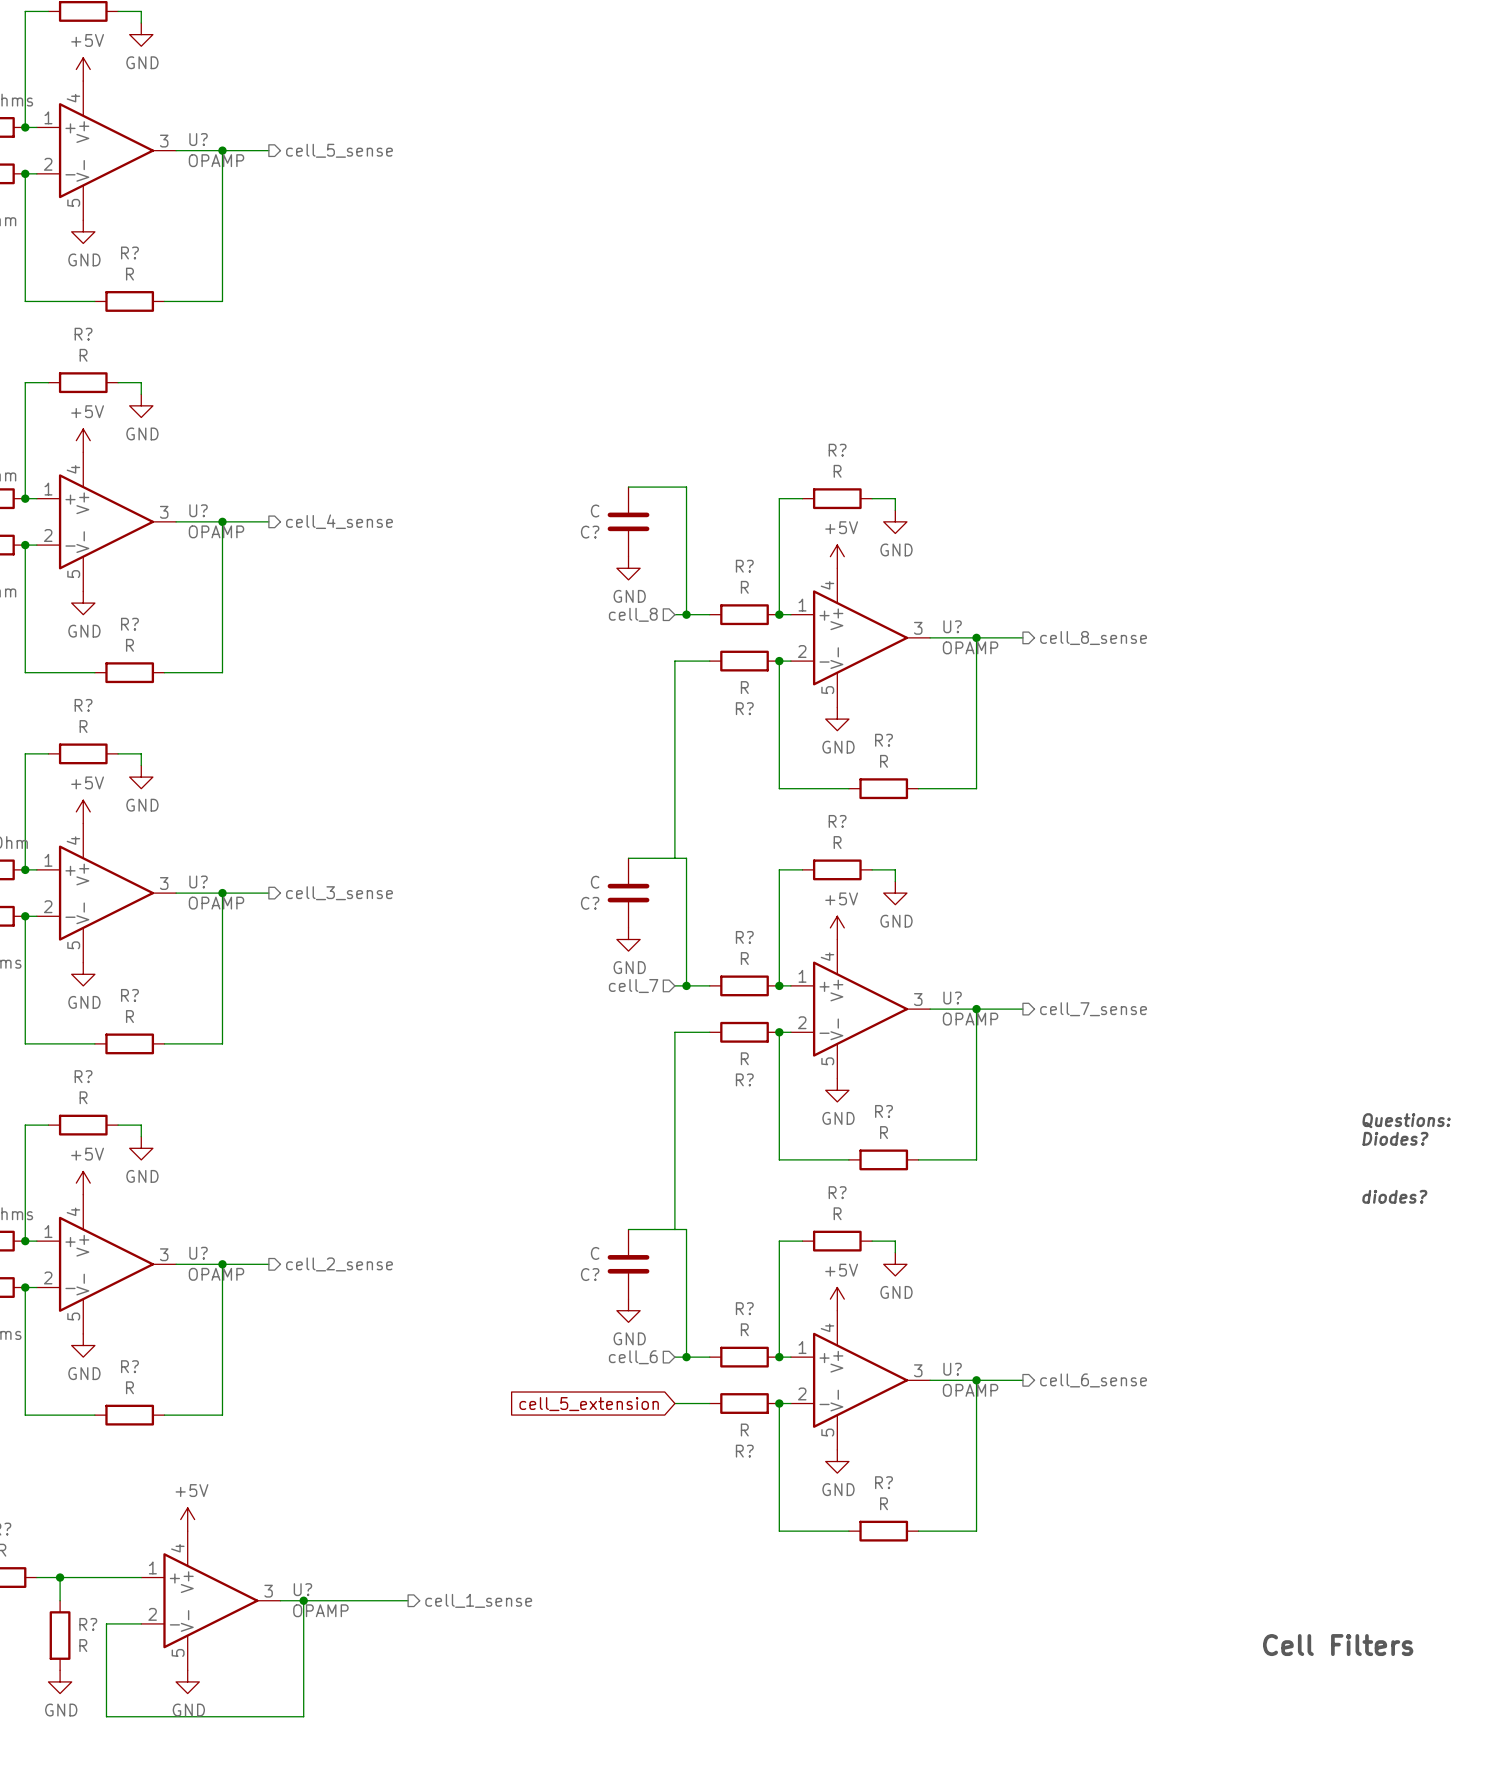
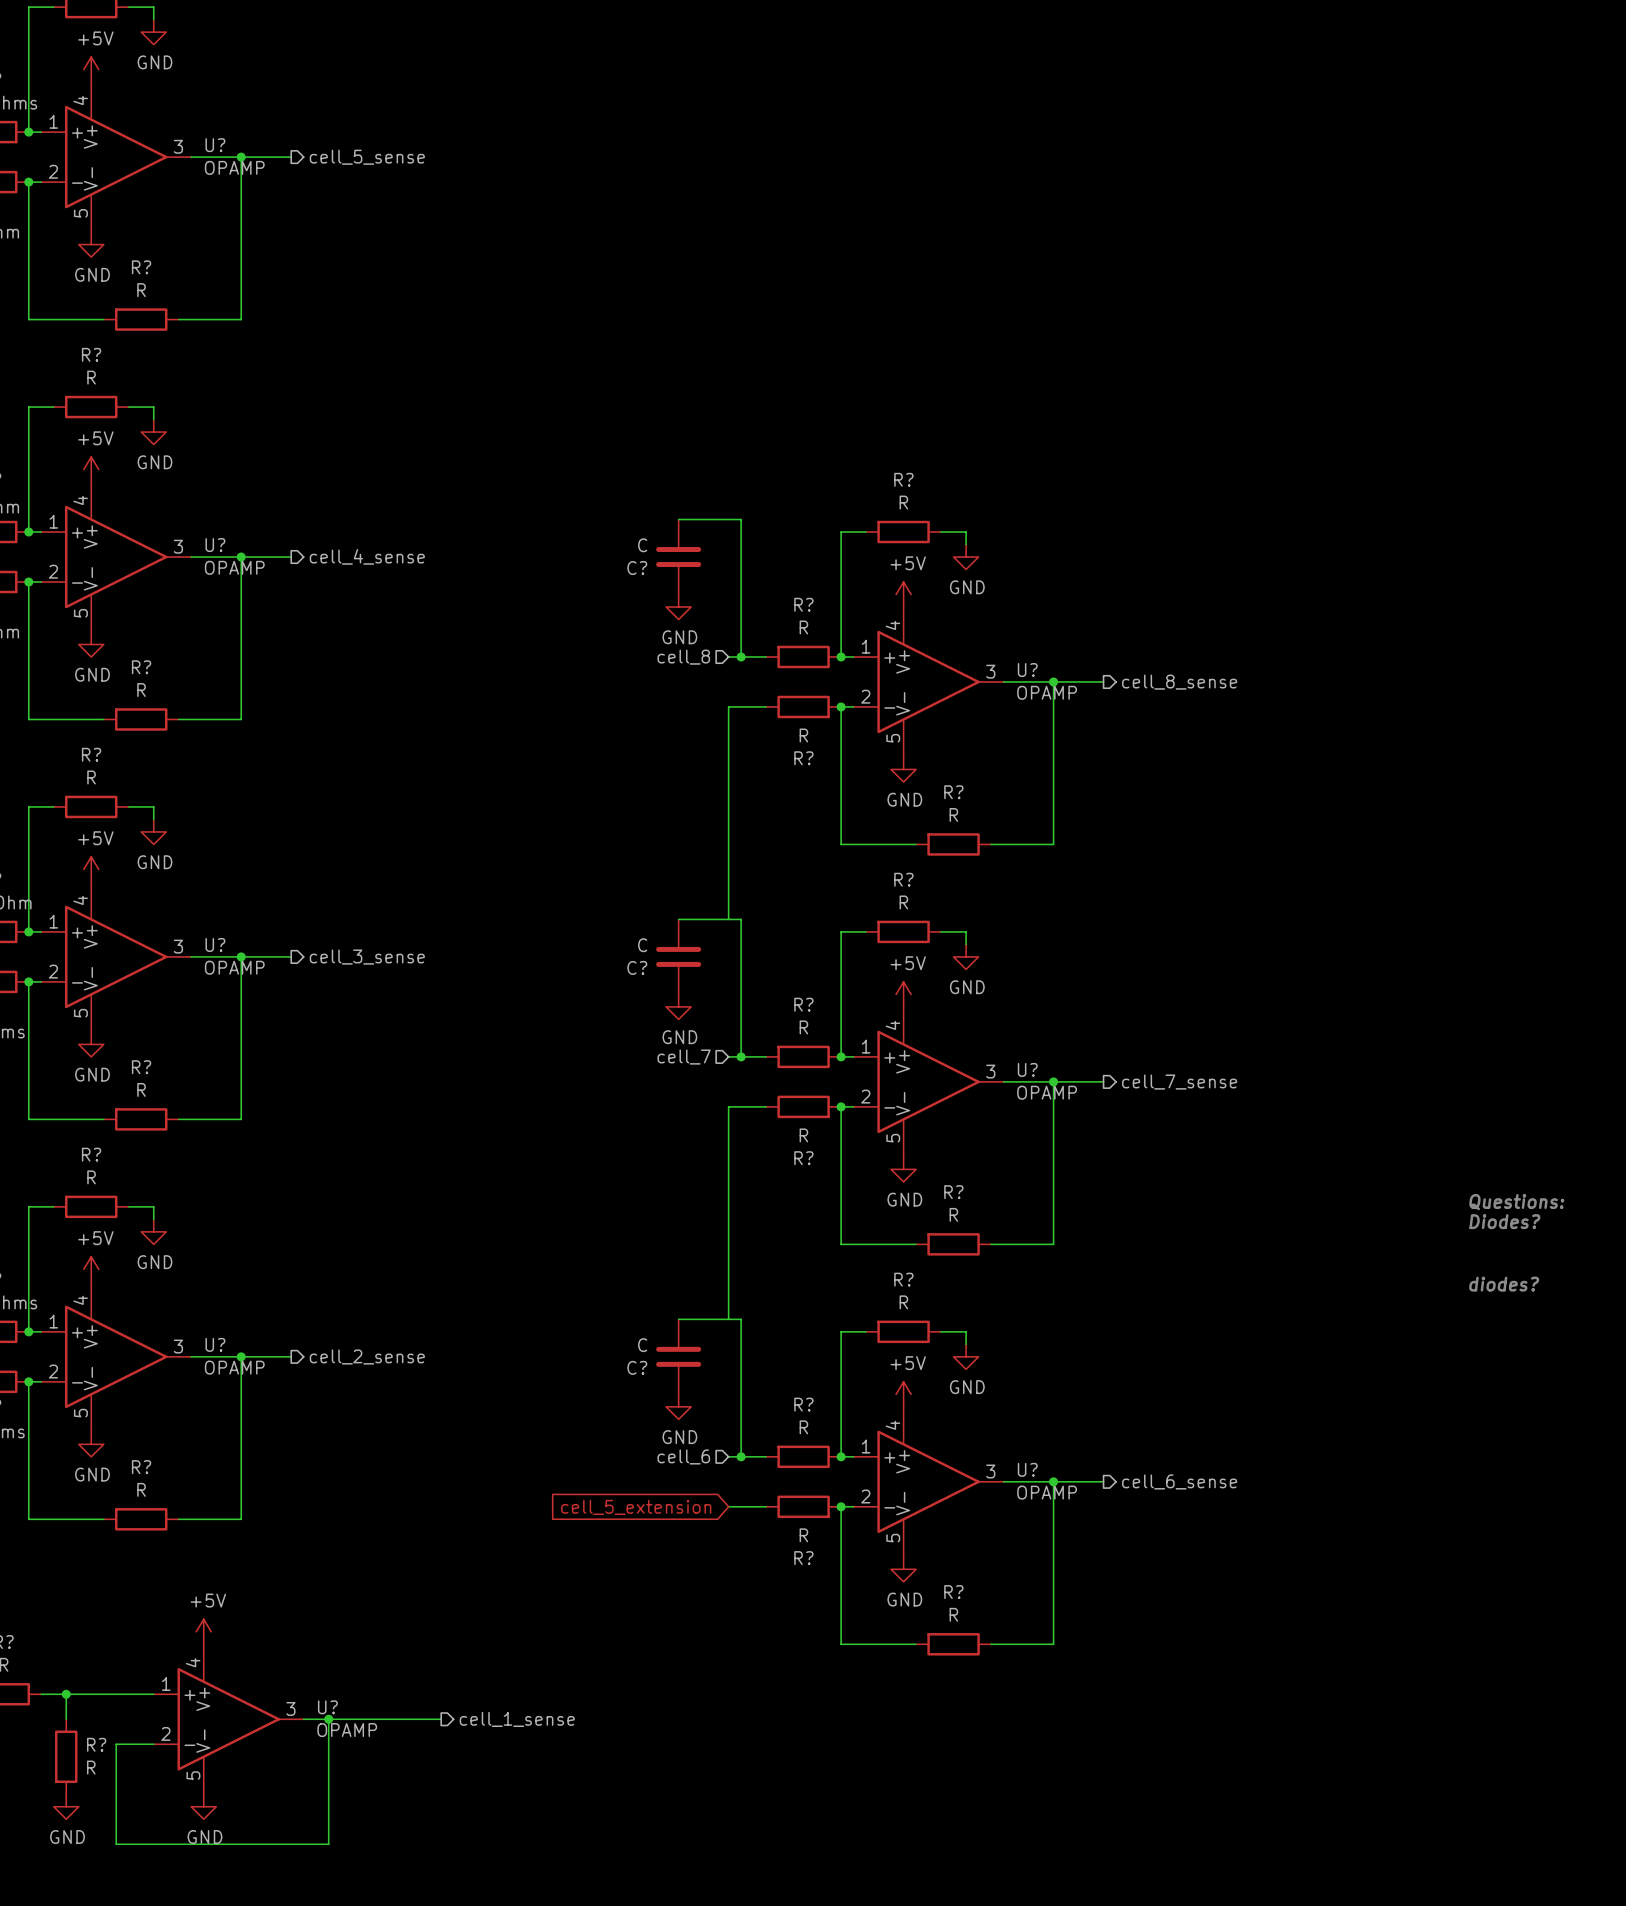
text: Cell Filters (1338, 1645) -> none

